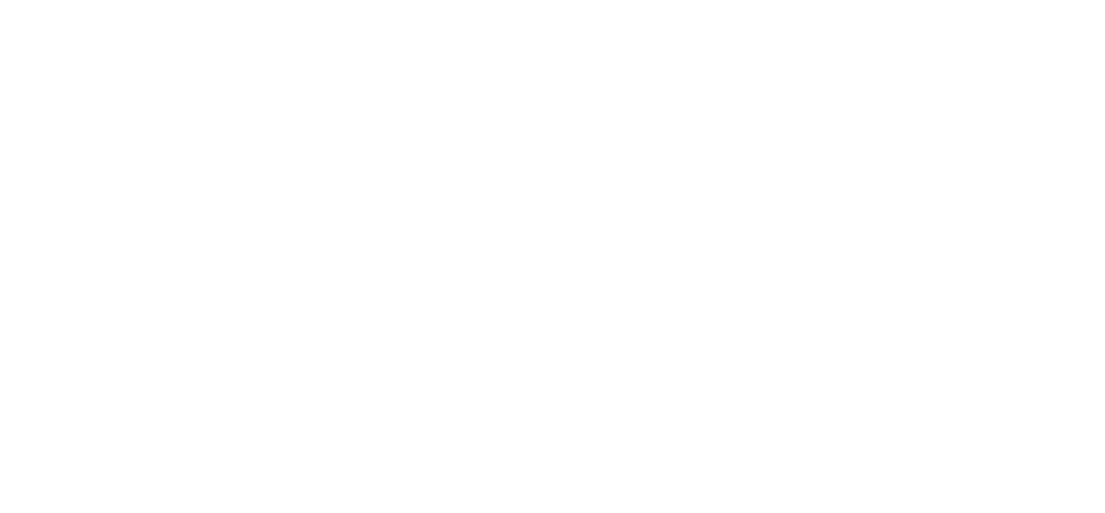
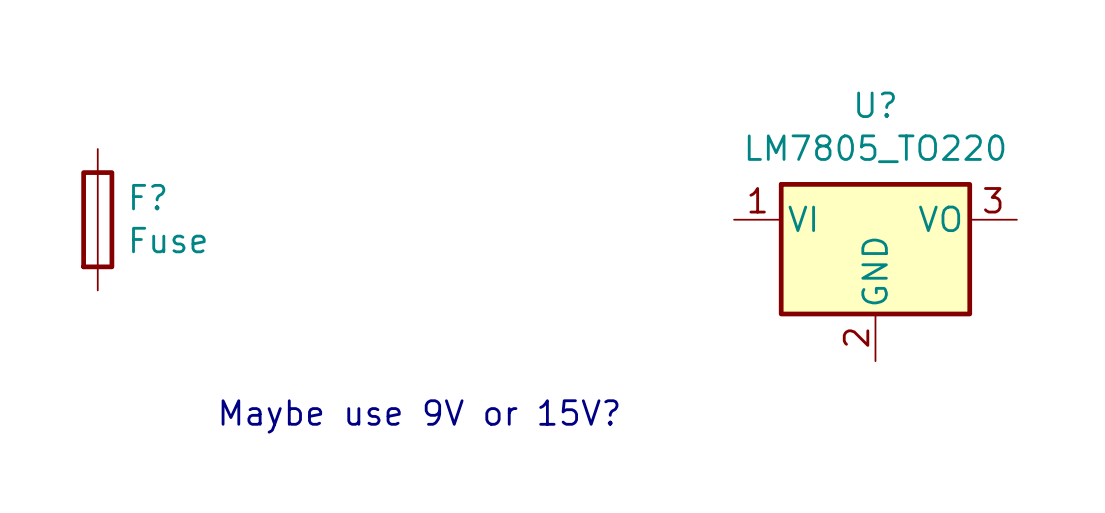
F?: none -> Fuse (97, 219)
U?: none -> LM7805_TO220 (875, 271)
text: none -> Maybe use 9V or 15V? (420, 416)

